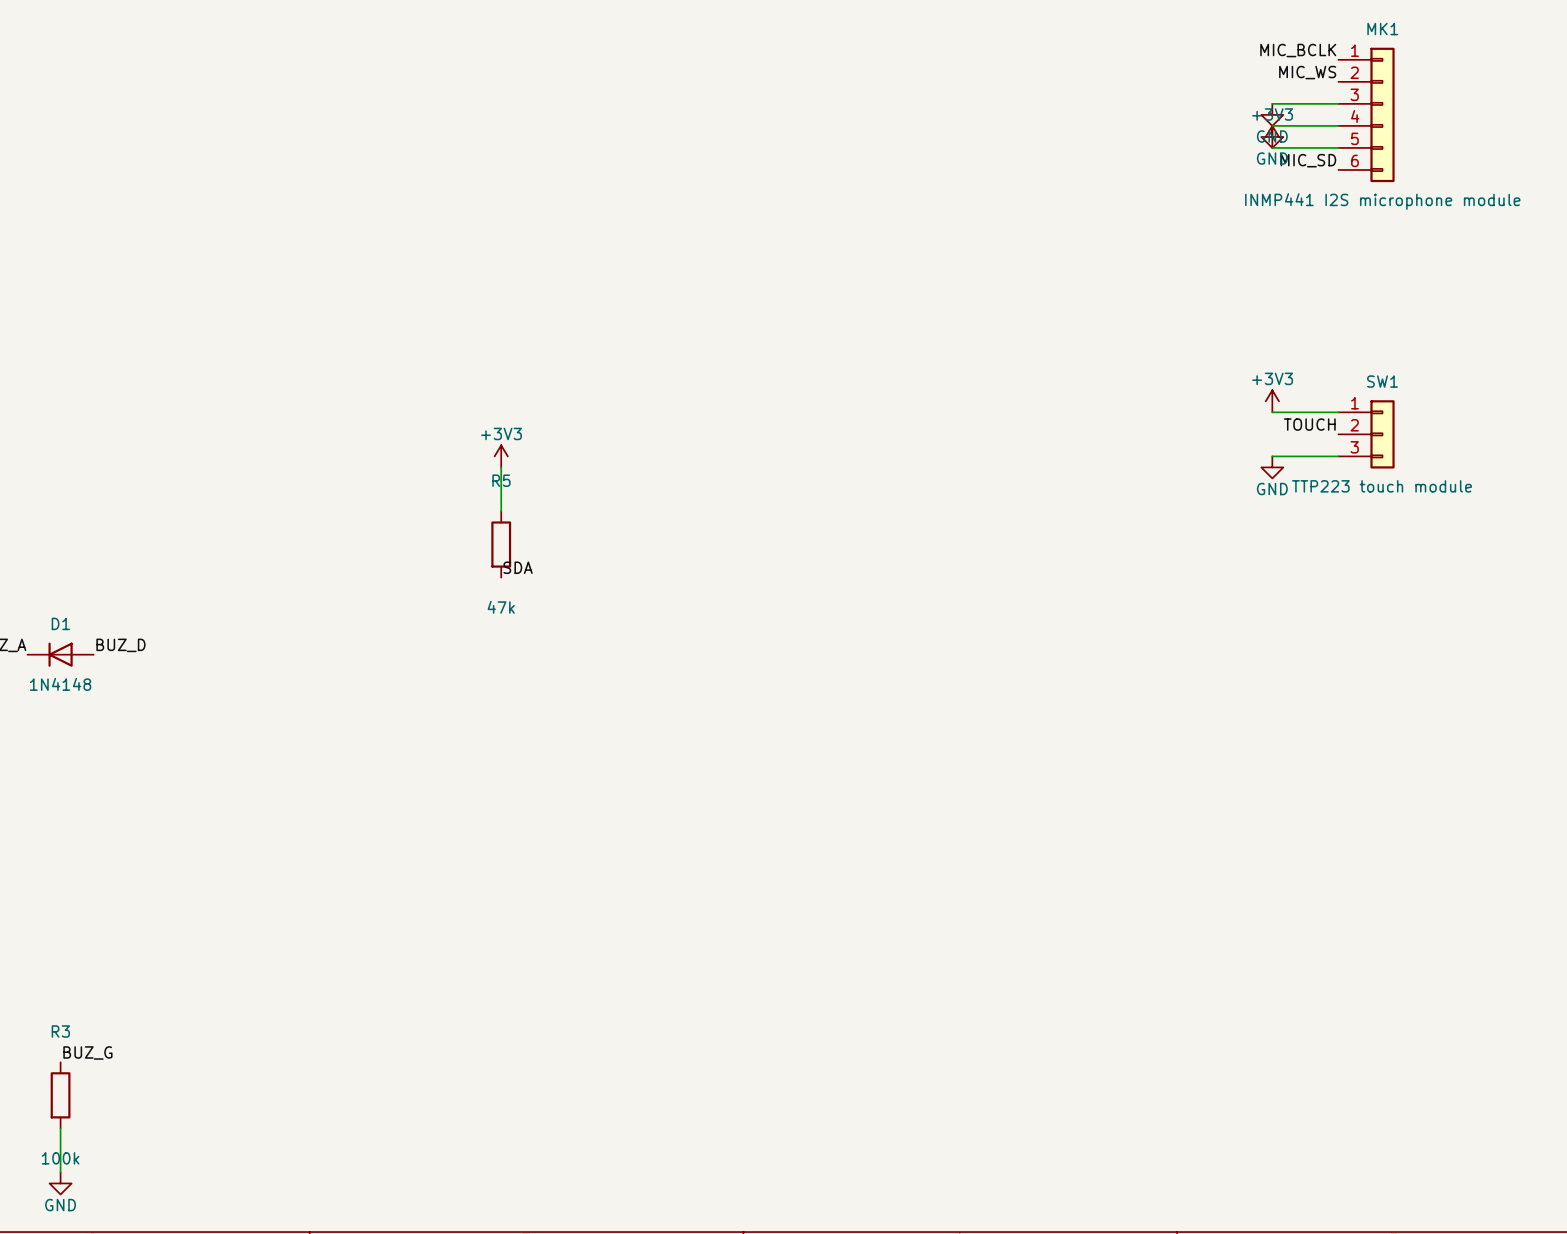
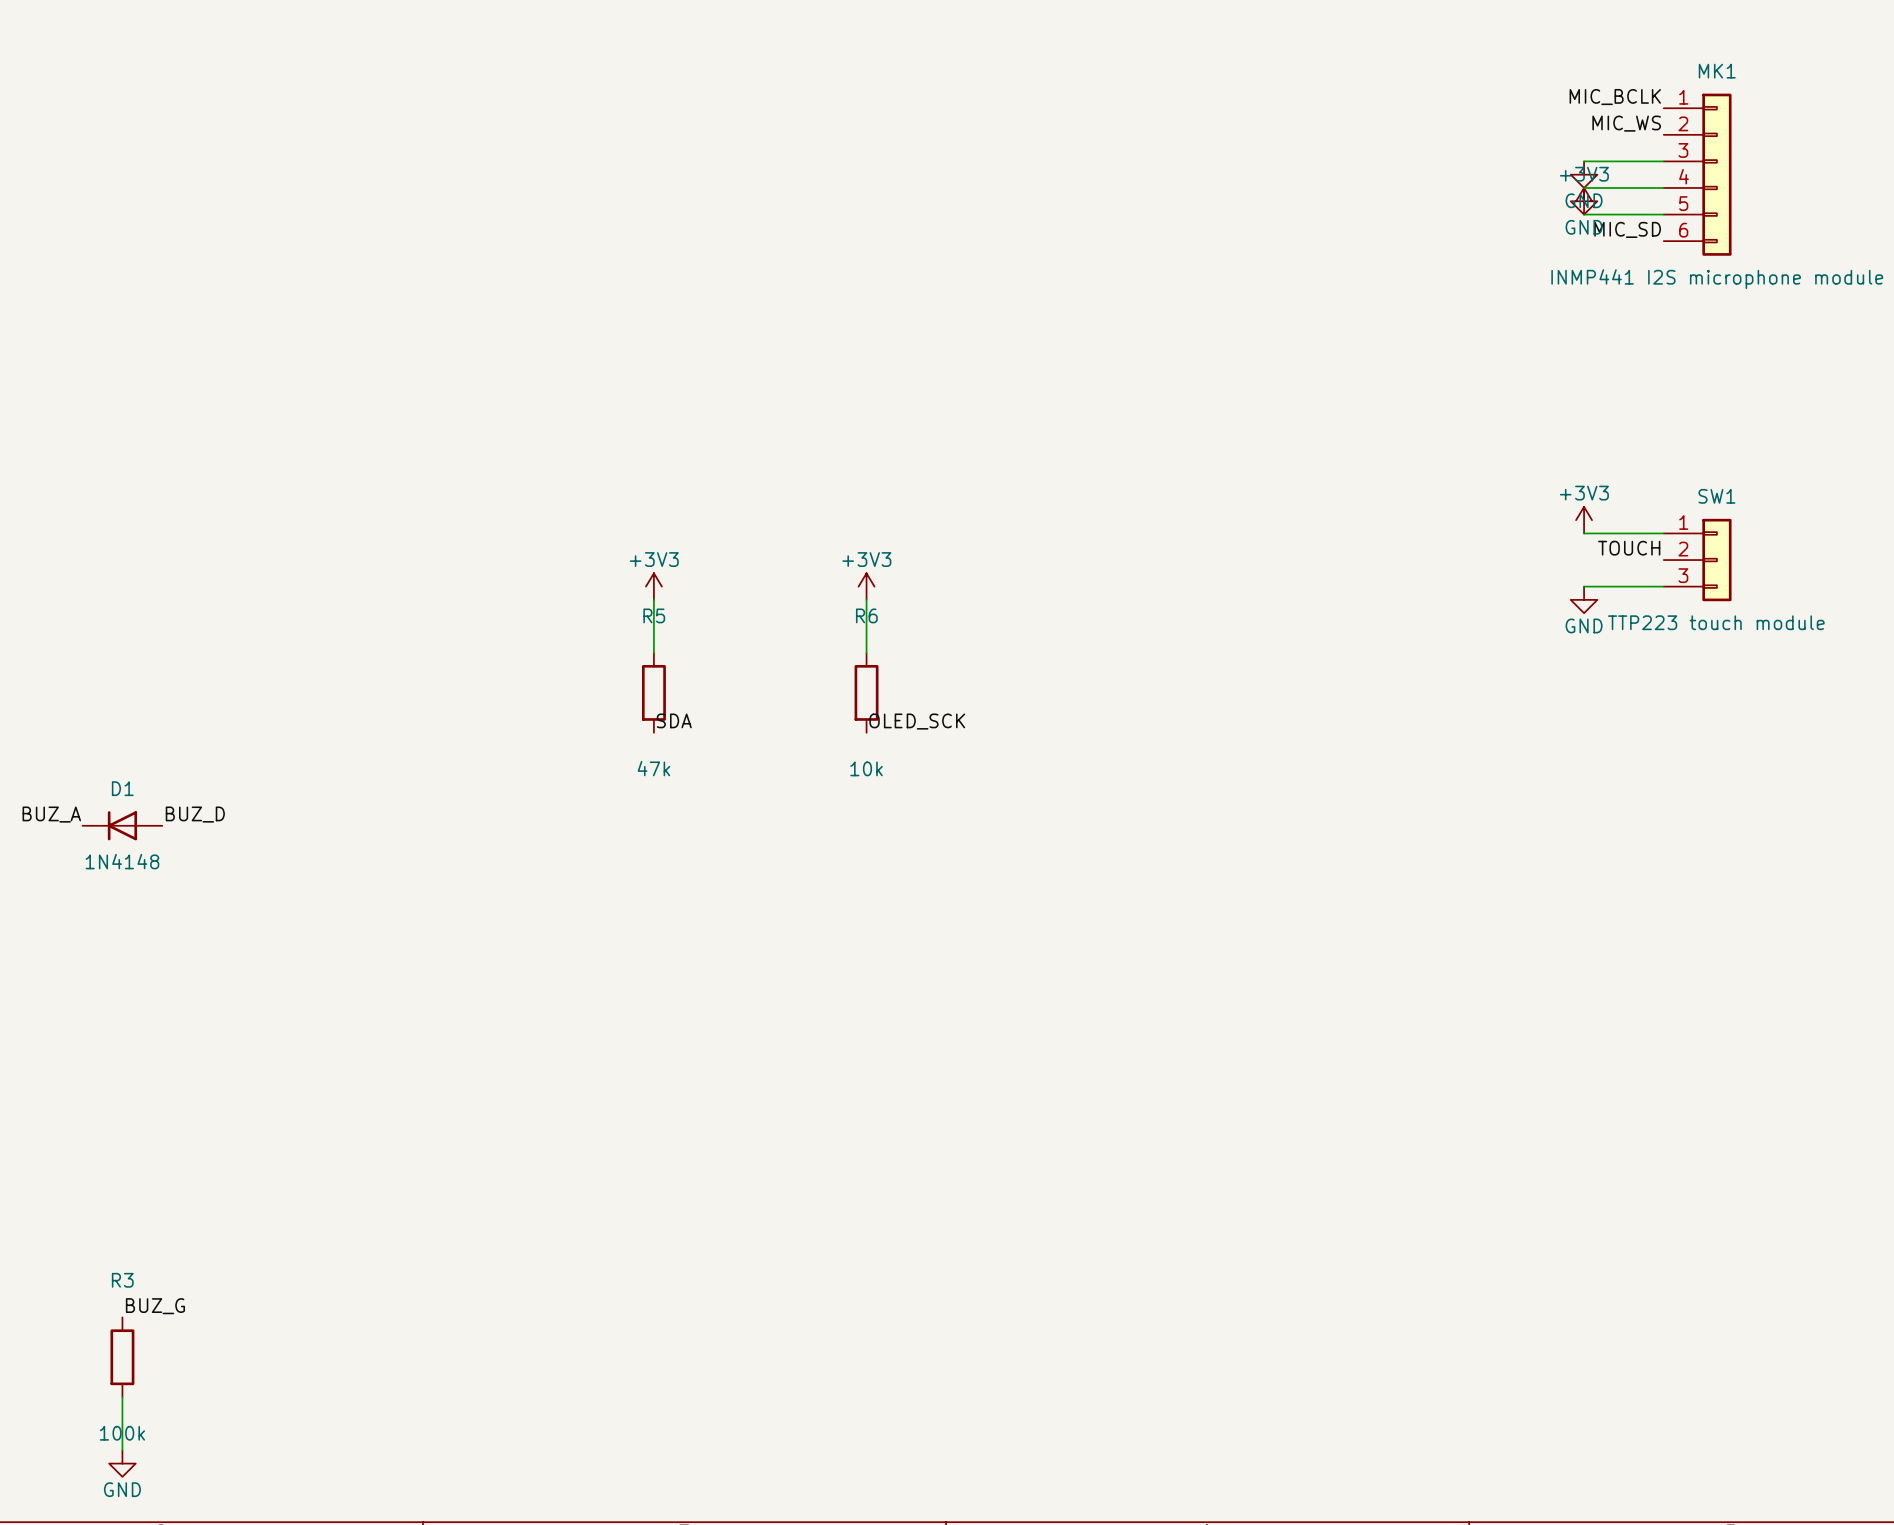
power symbol: none -> +3V3 (866, 586)
wire: none -> (866, 599) (866, 653)
R6: none -> 10k (866, 692)
label: none -> OLED_SCK (917, 721)

